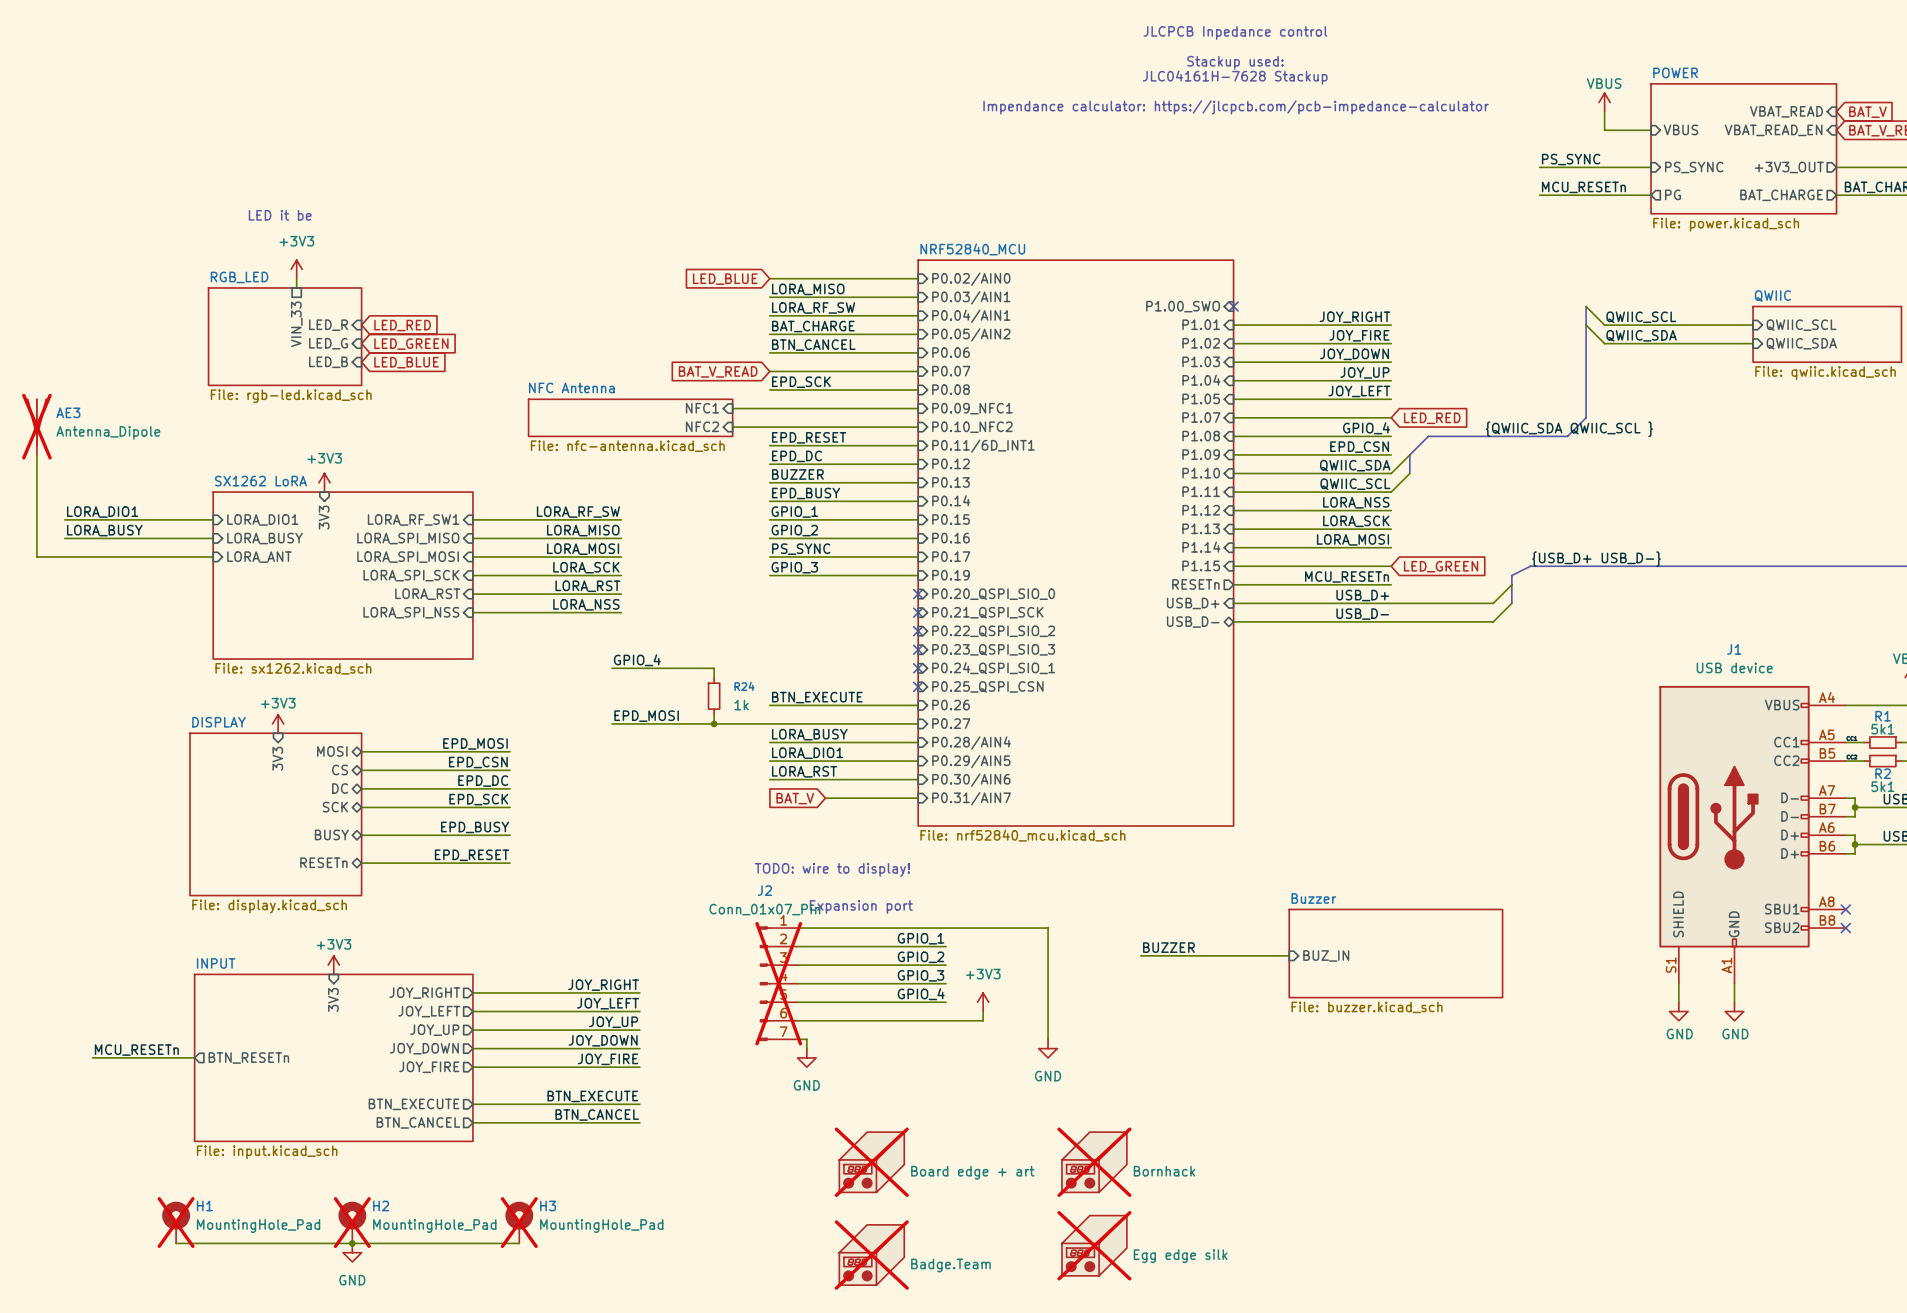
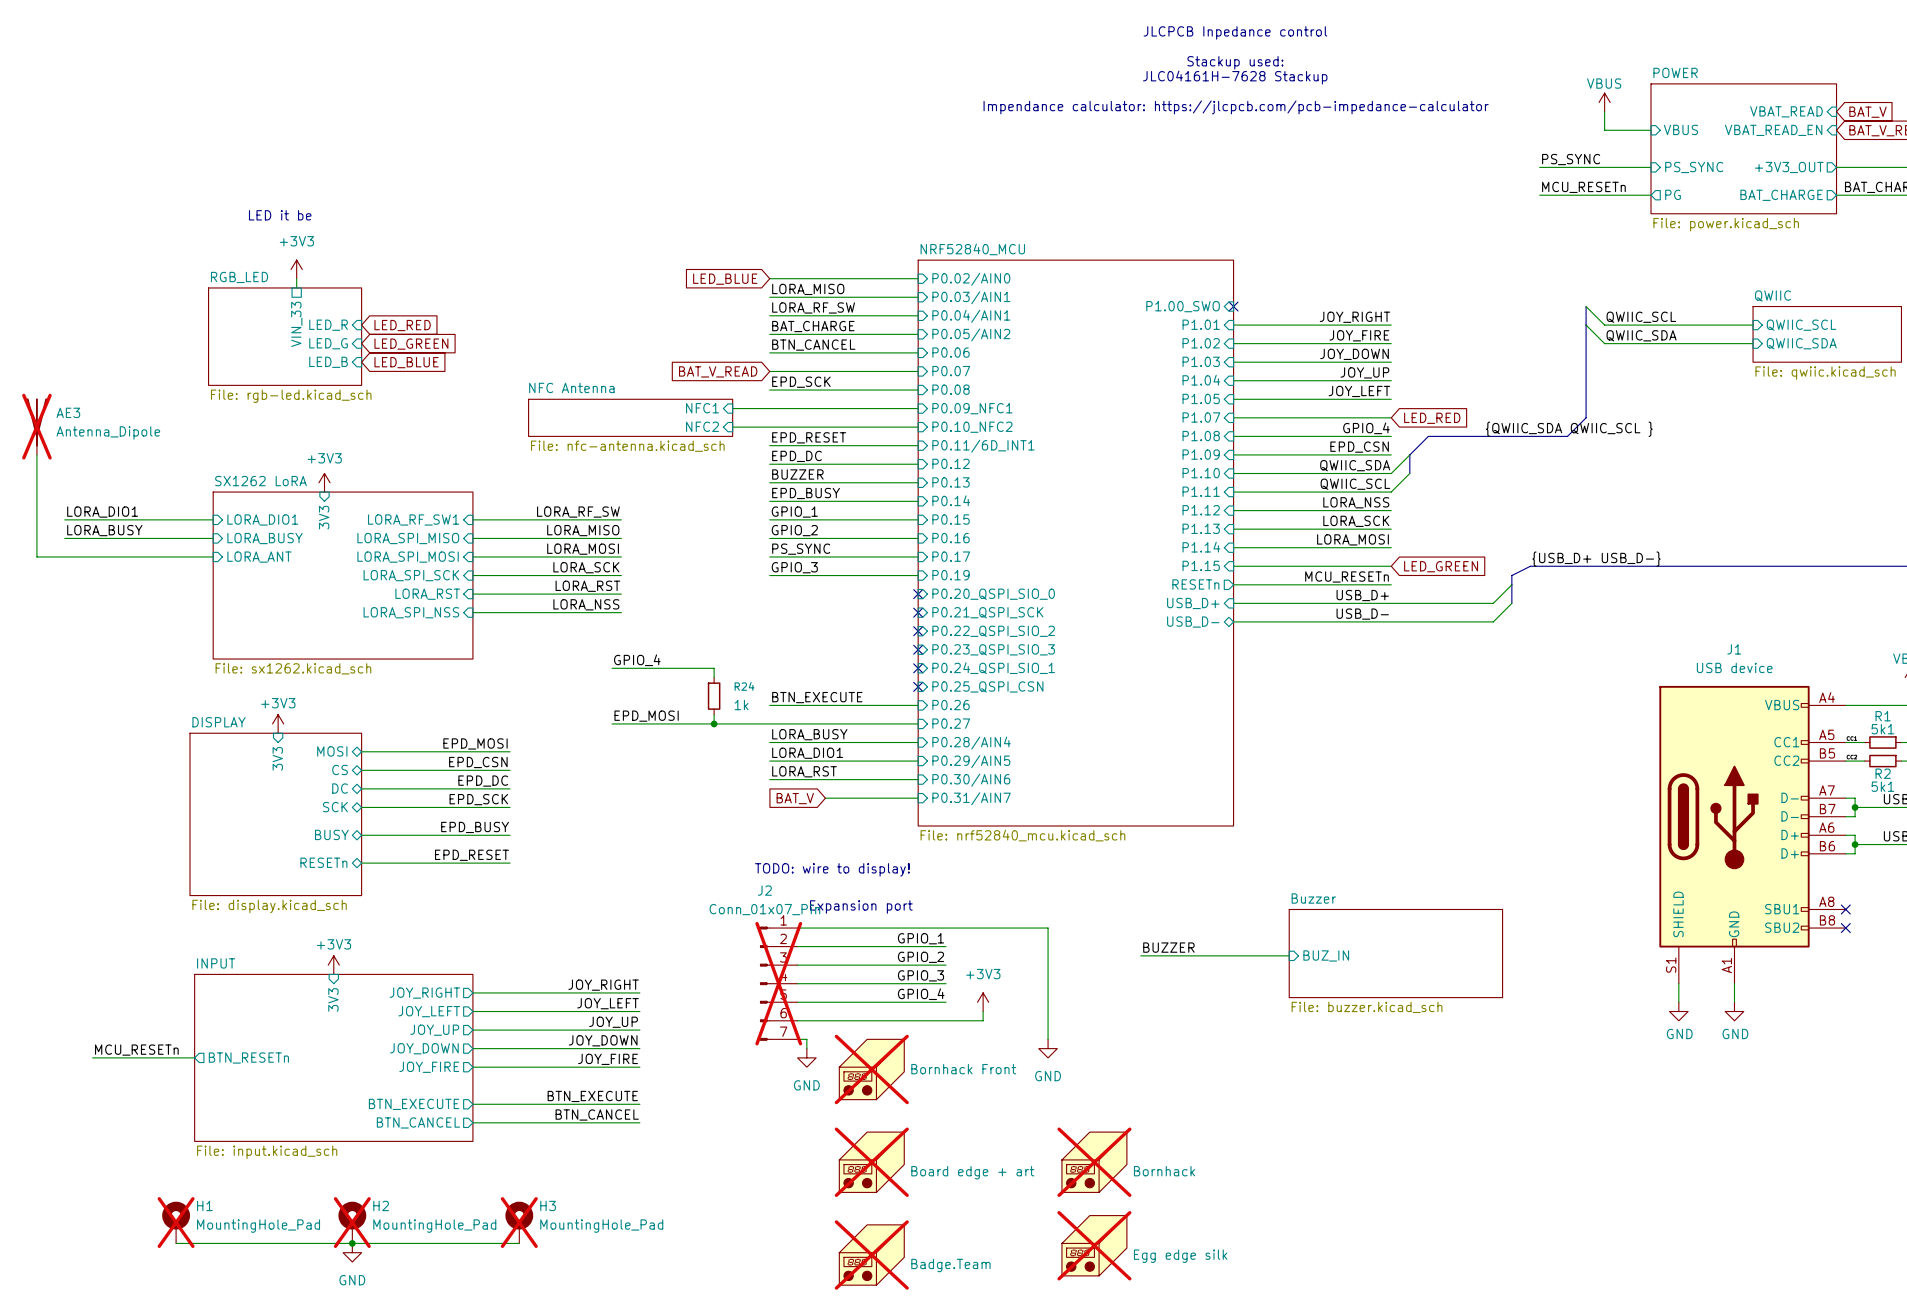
part: none -> Bornhack Front (871, 1069)

